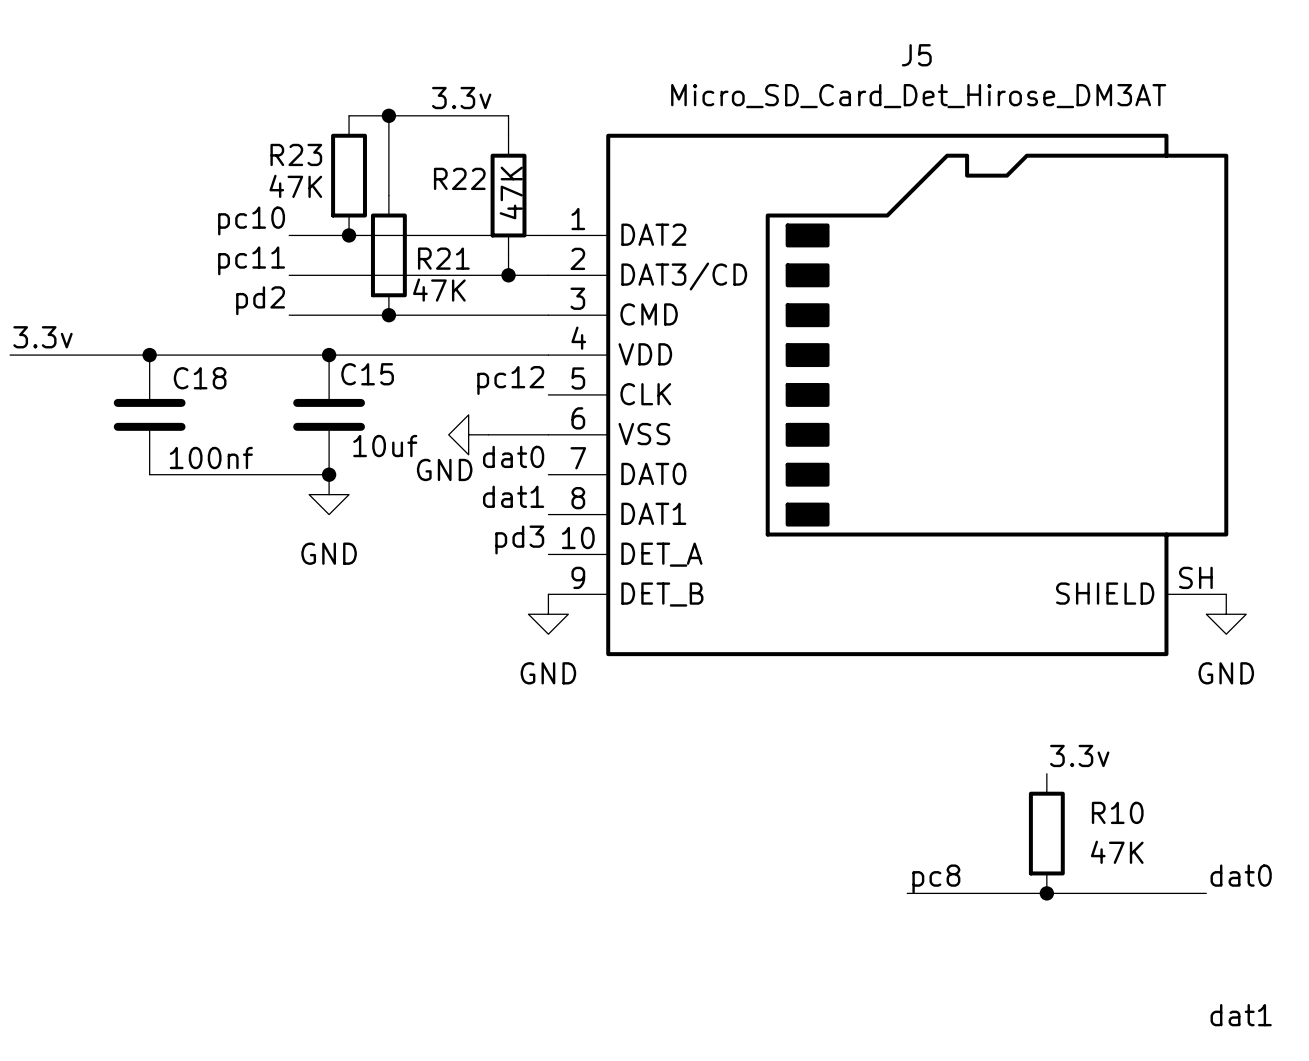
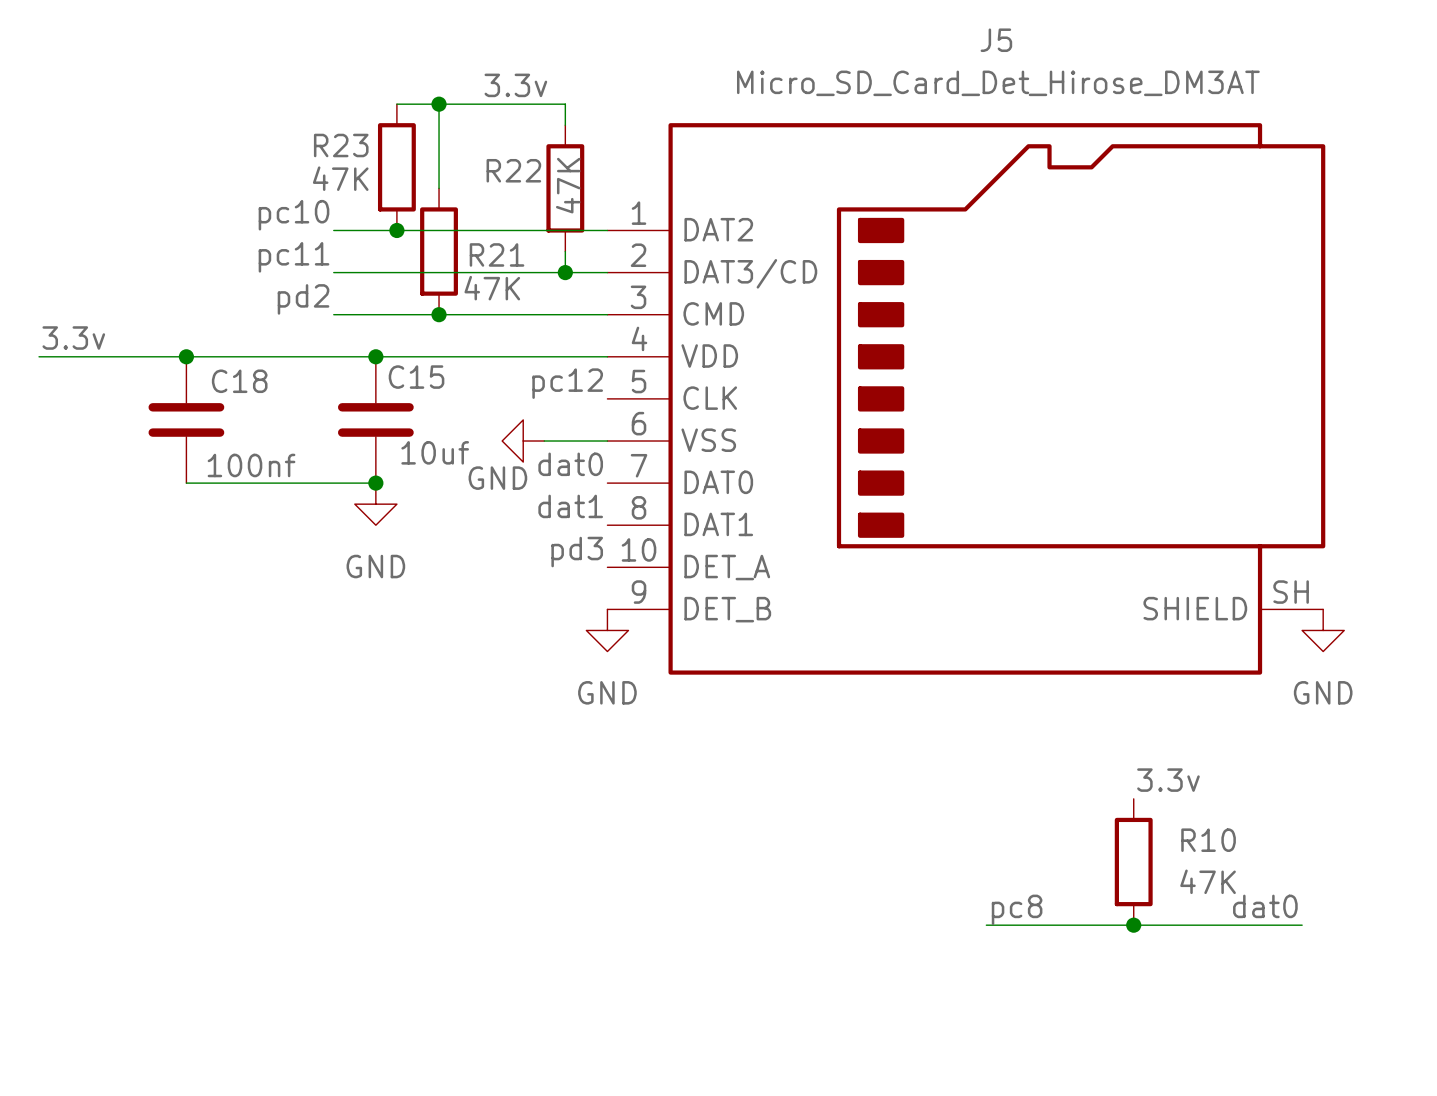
label position: dat0 (1241, 875) -> dat0 (1265, 906)
label: dat1 (1241, 1015) -> none

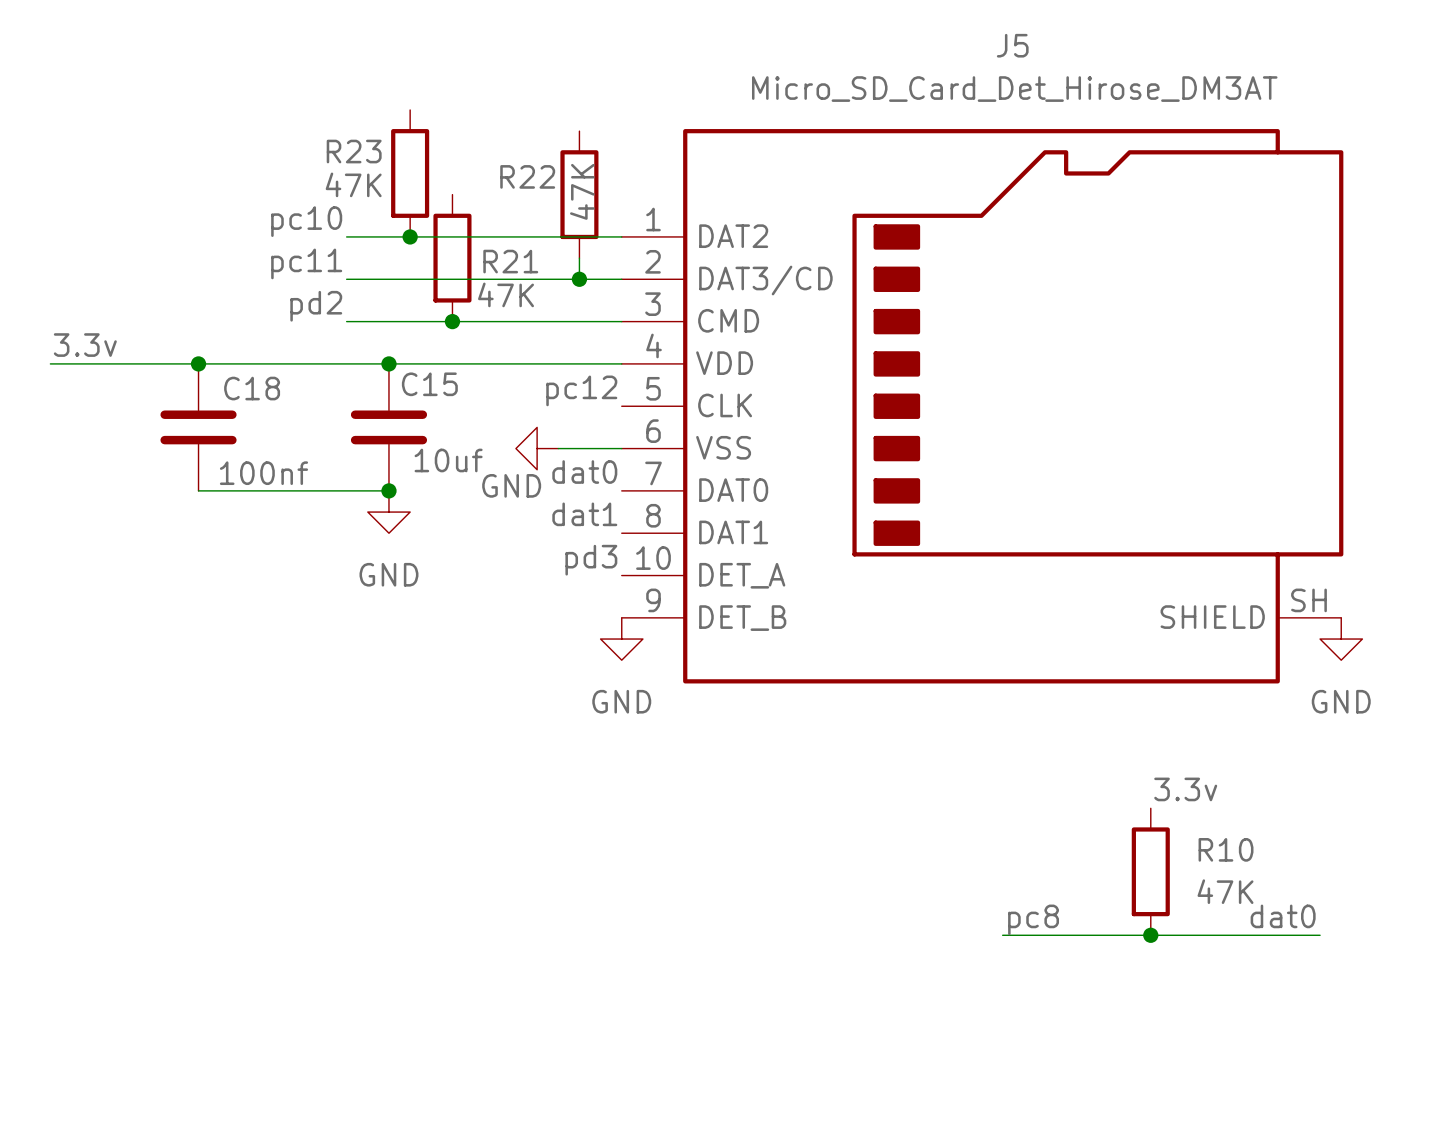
label: 3.3v (515, 85) -> none
wire: (396, 104) (565, 104) (565, 125) -> none
wire: (439, 104) (439, 188) -> none
junction: (439, 104) -> none

